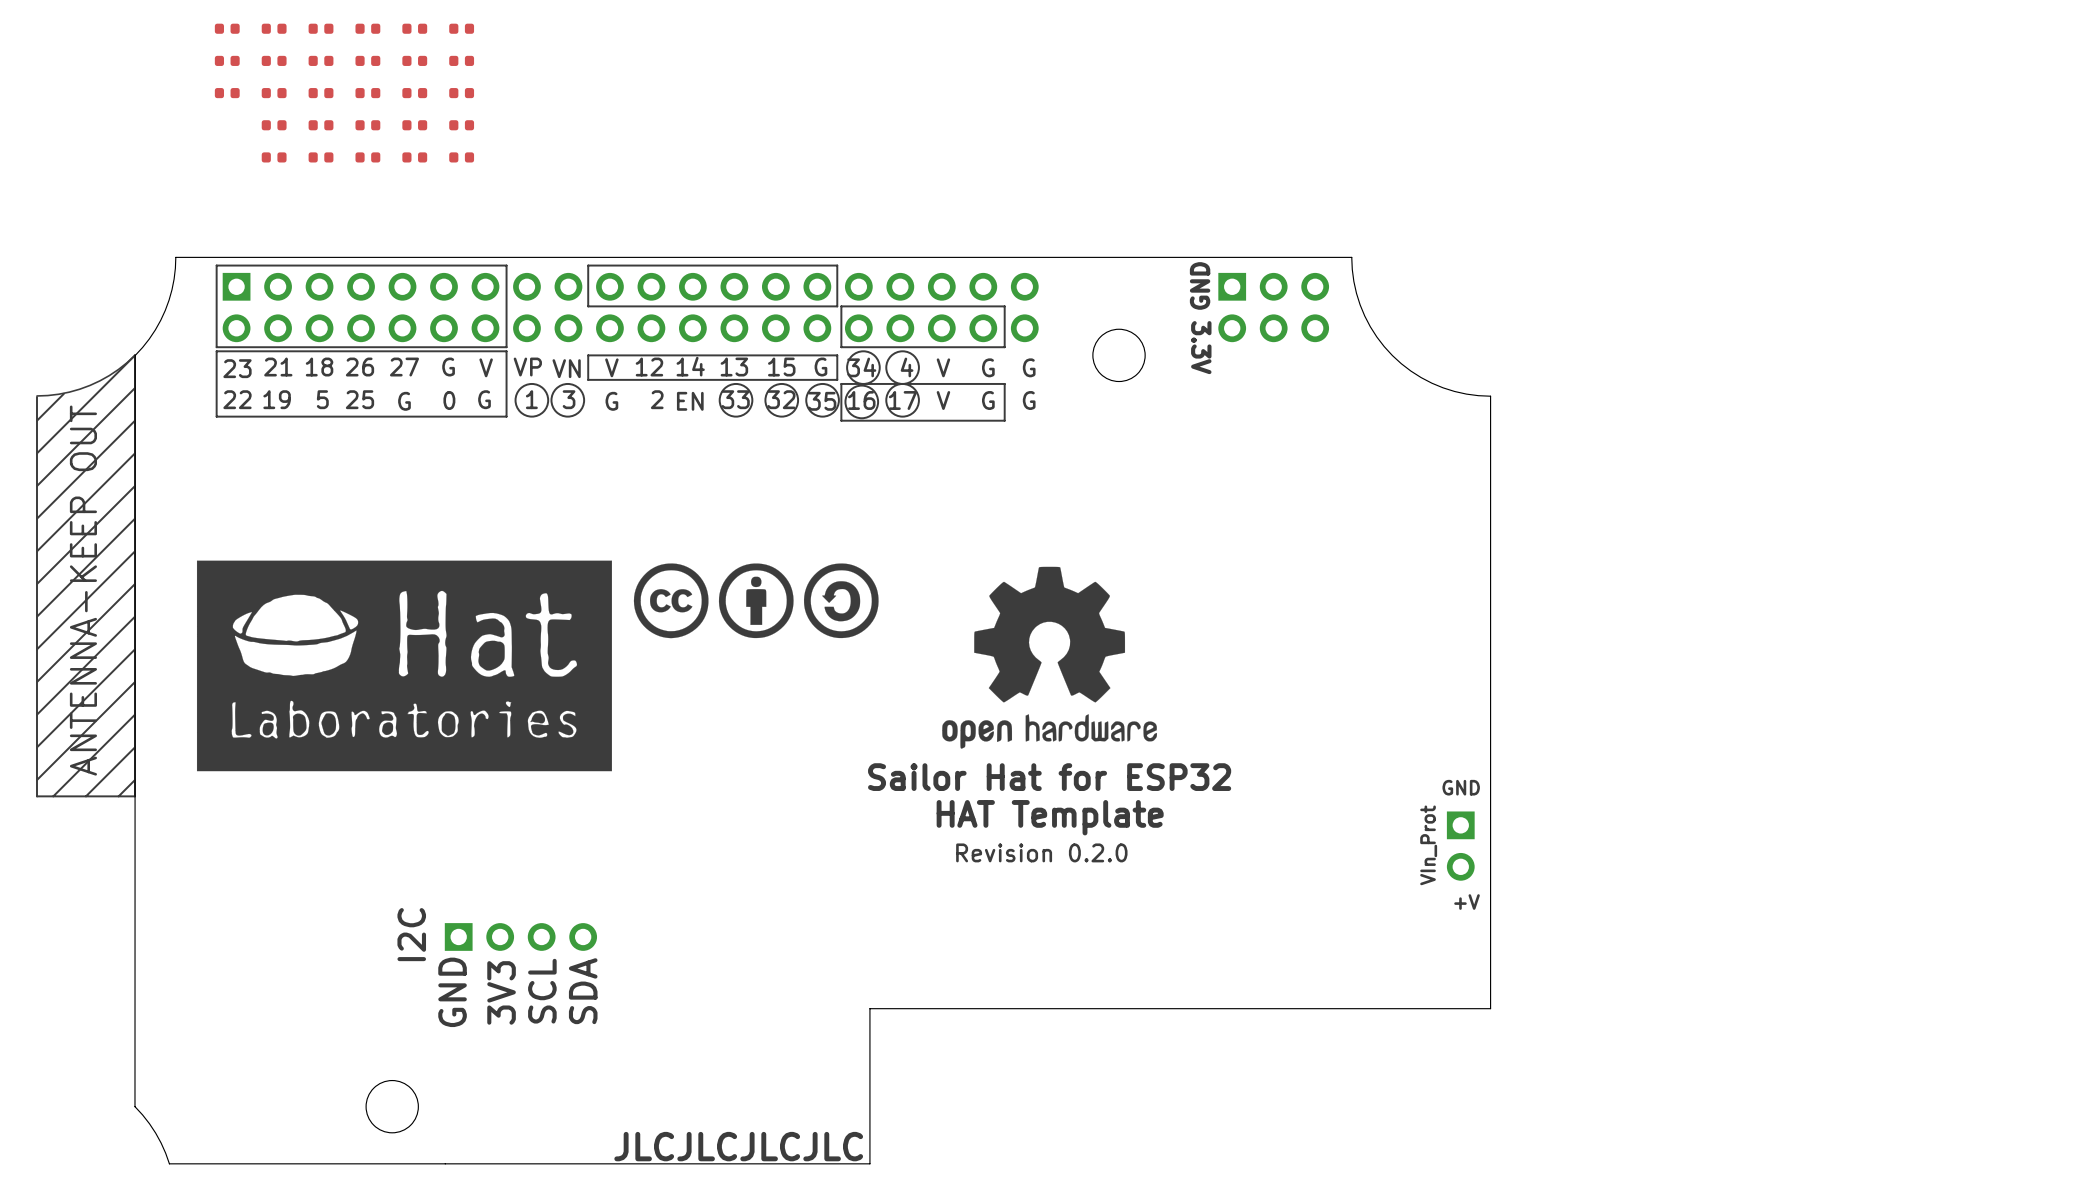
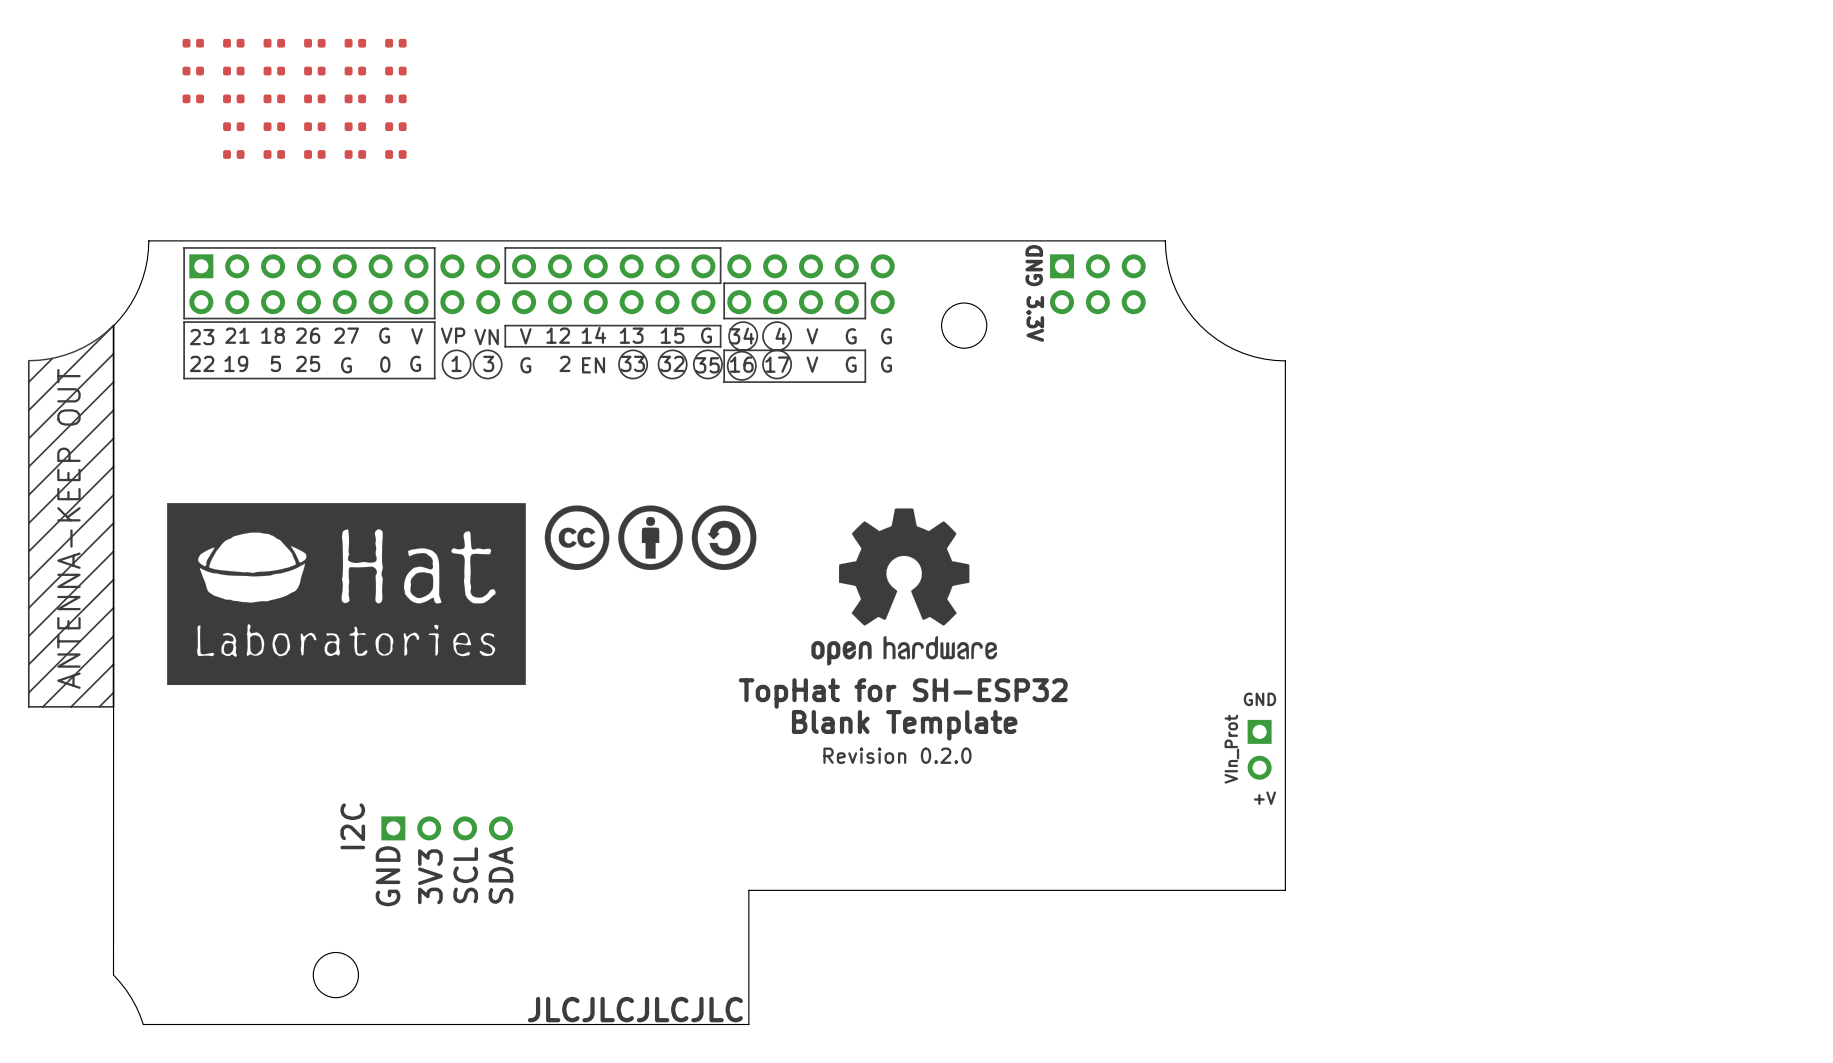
text: Sailor Hat for ESP32 (1049, 777) -> TopHat for SH-ESP32 (903, 693)
text: HAT Template (1050, 817) -> Blank Template (904, 725)

